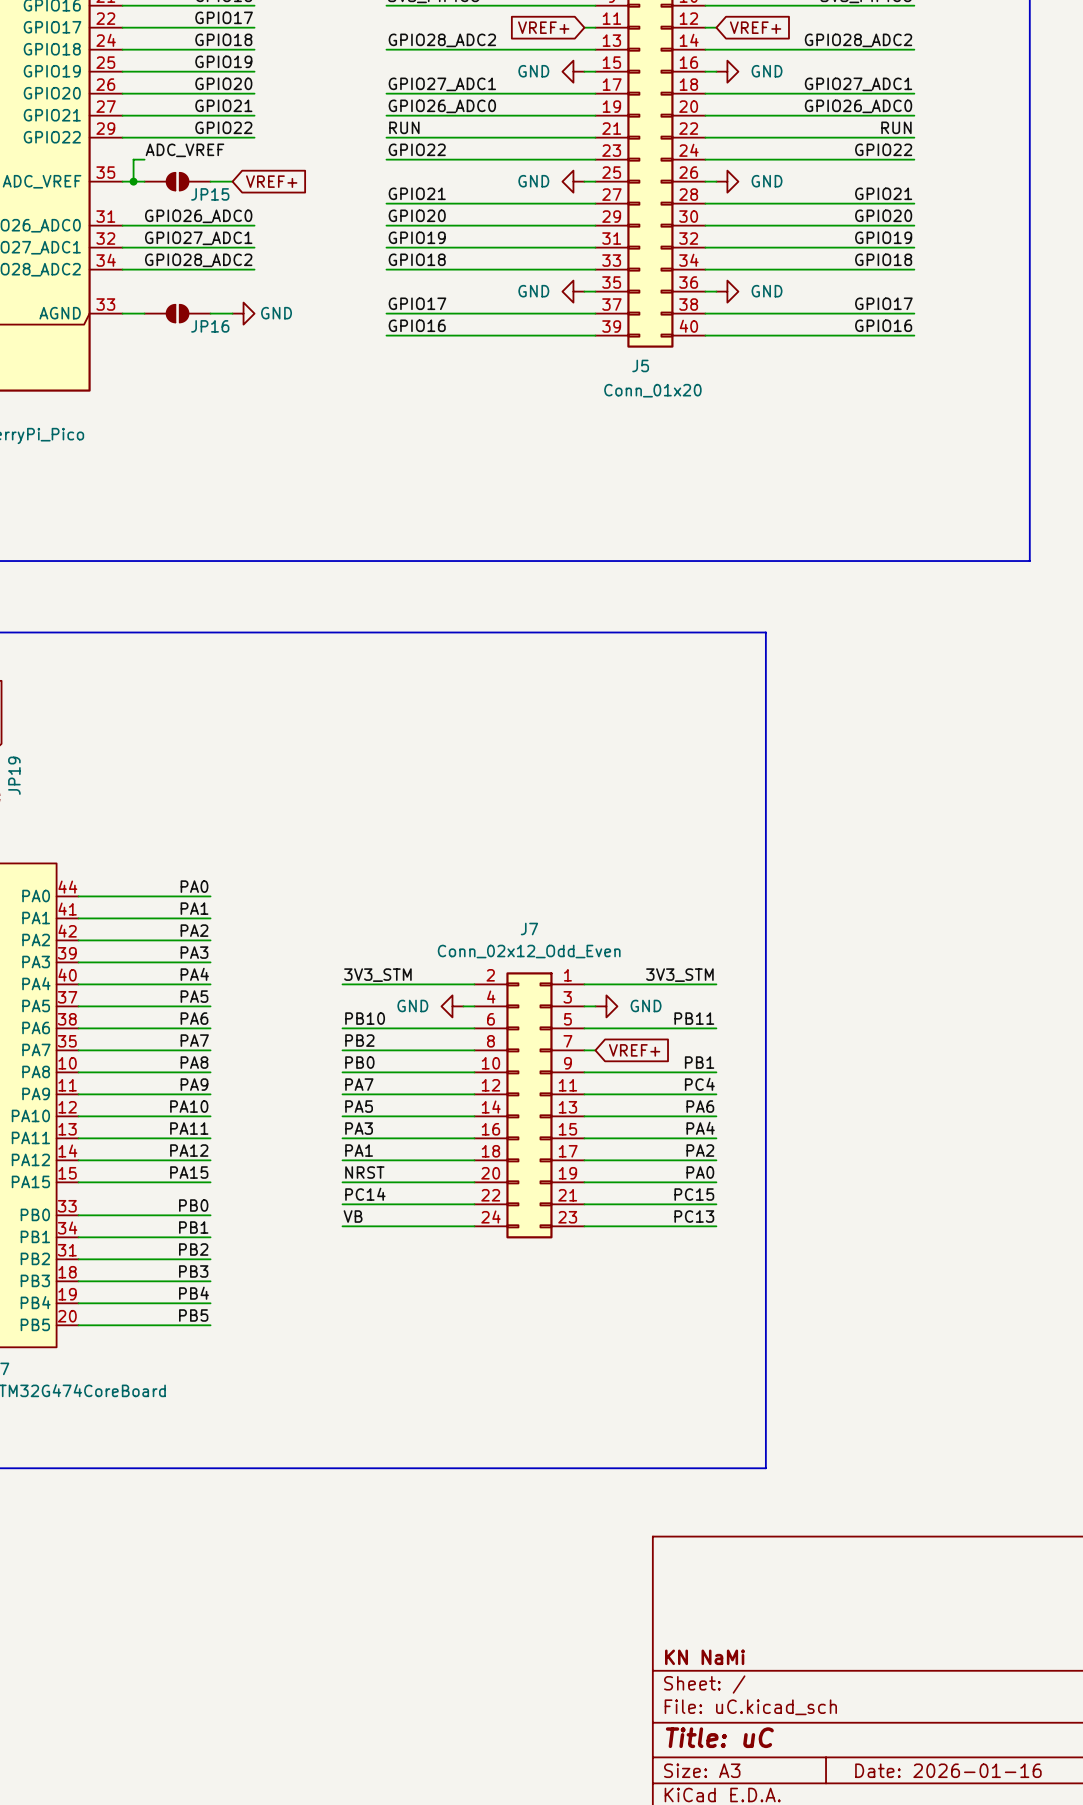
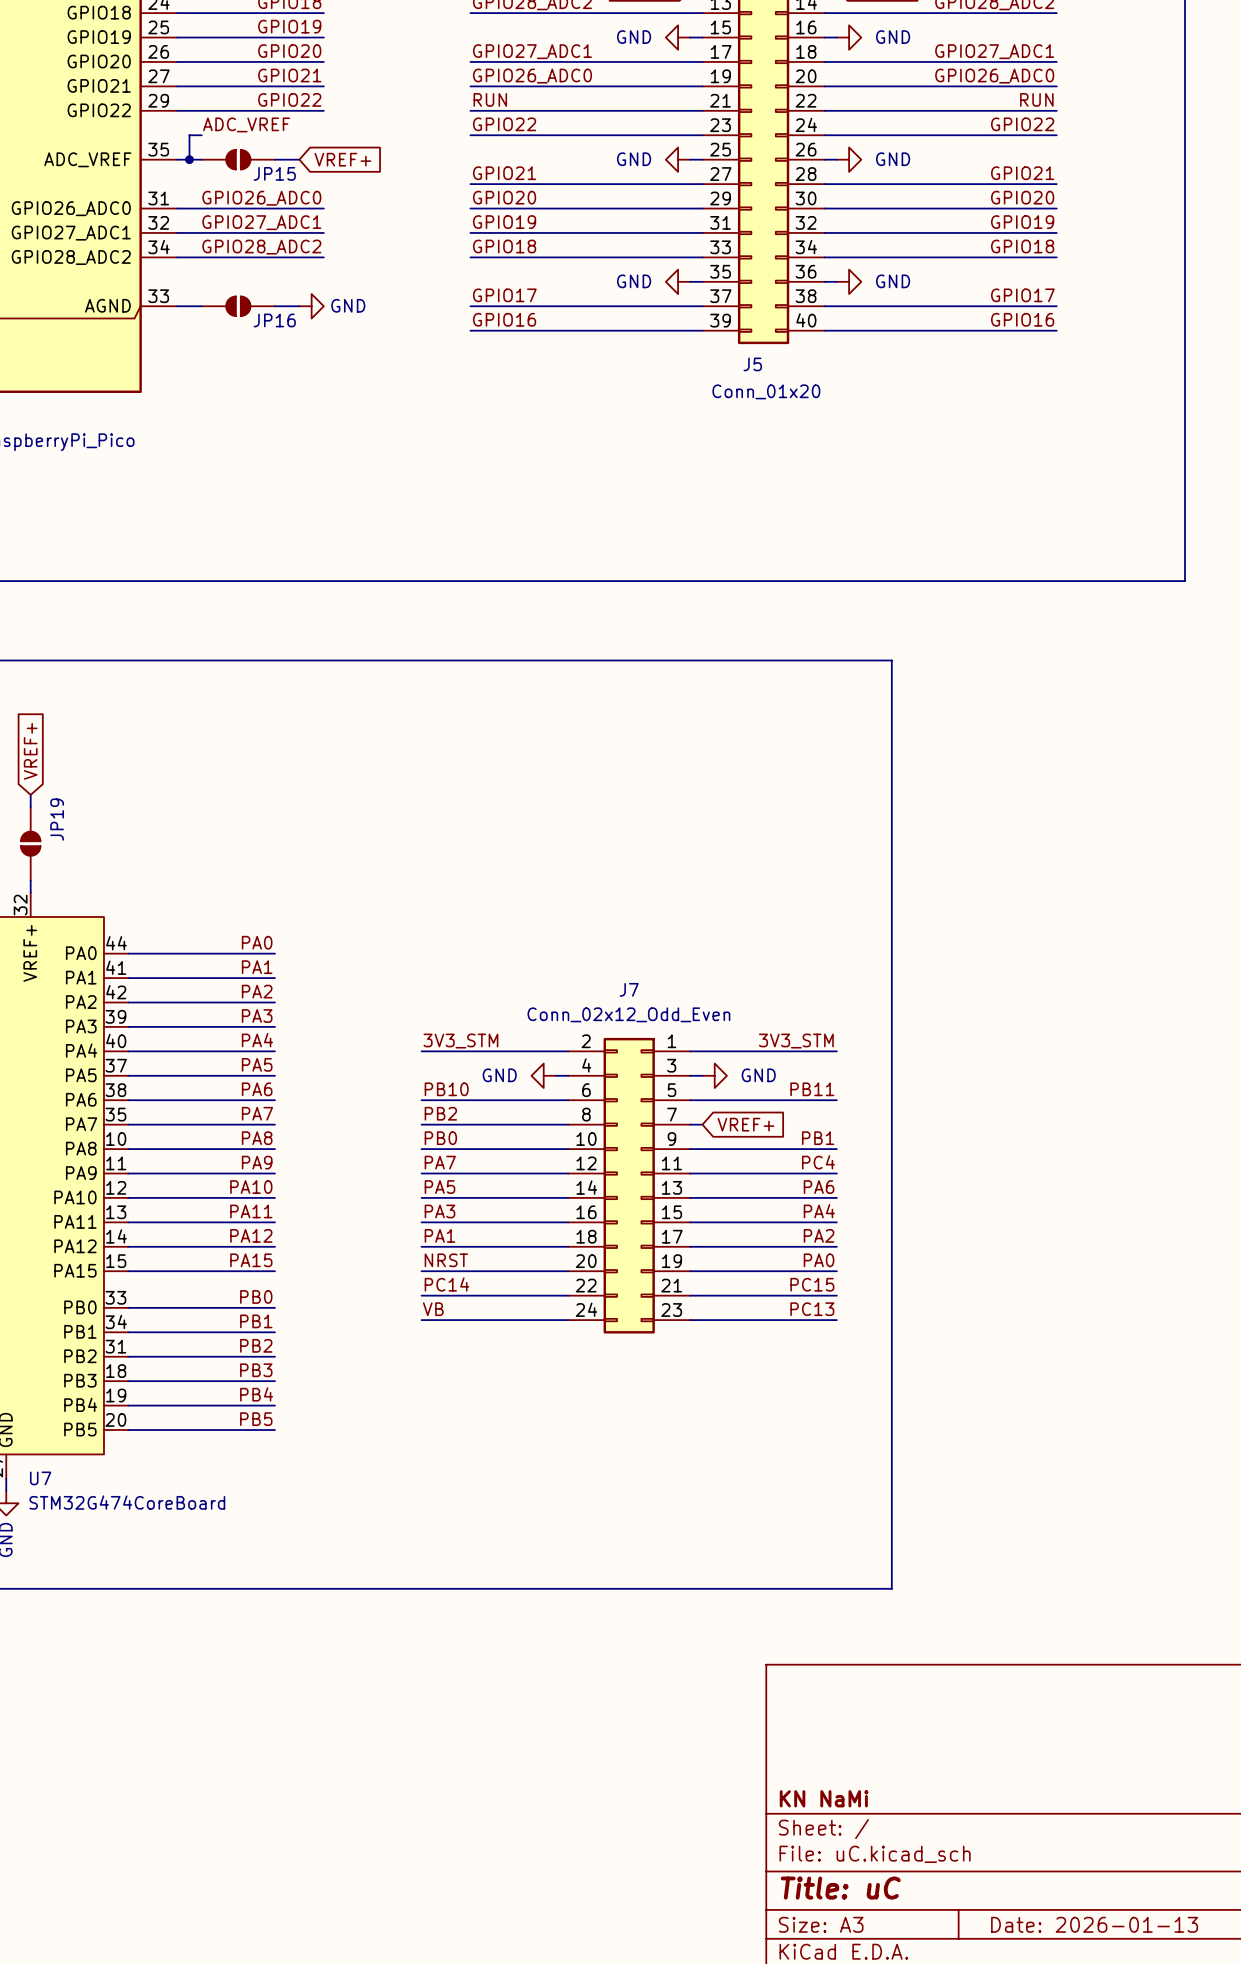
title block: Date: 2026-01-16 (948, 1770) -> Date: 2026-01-13 (1094, 1924)

